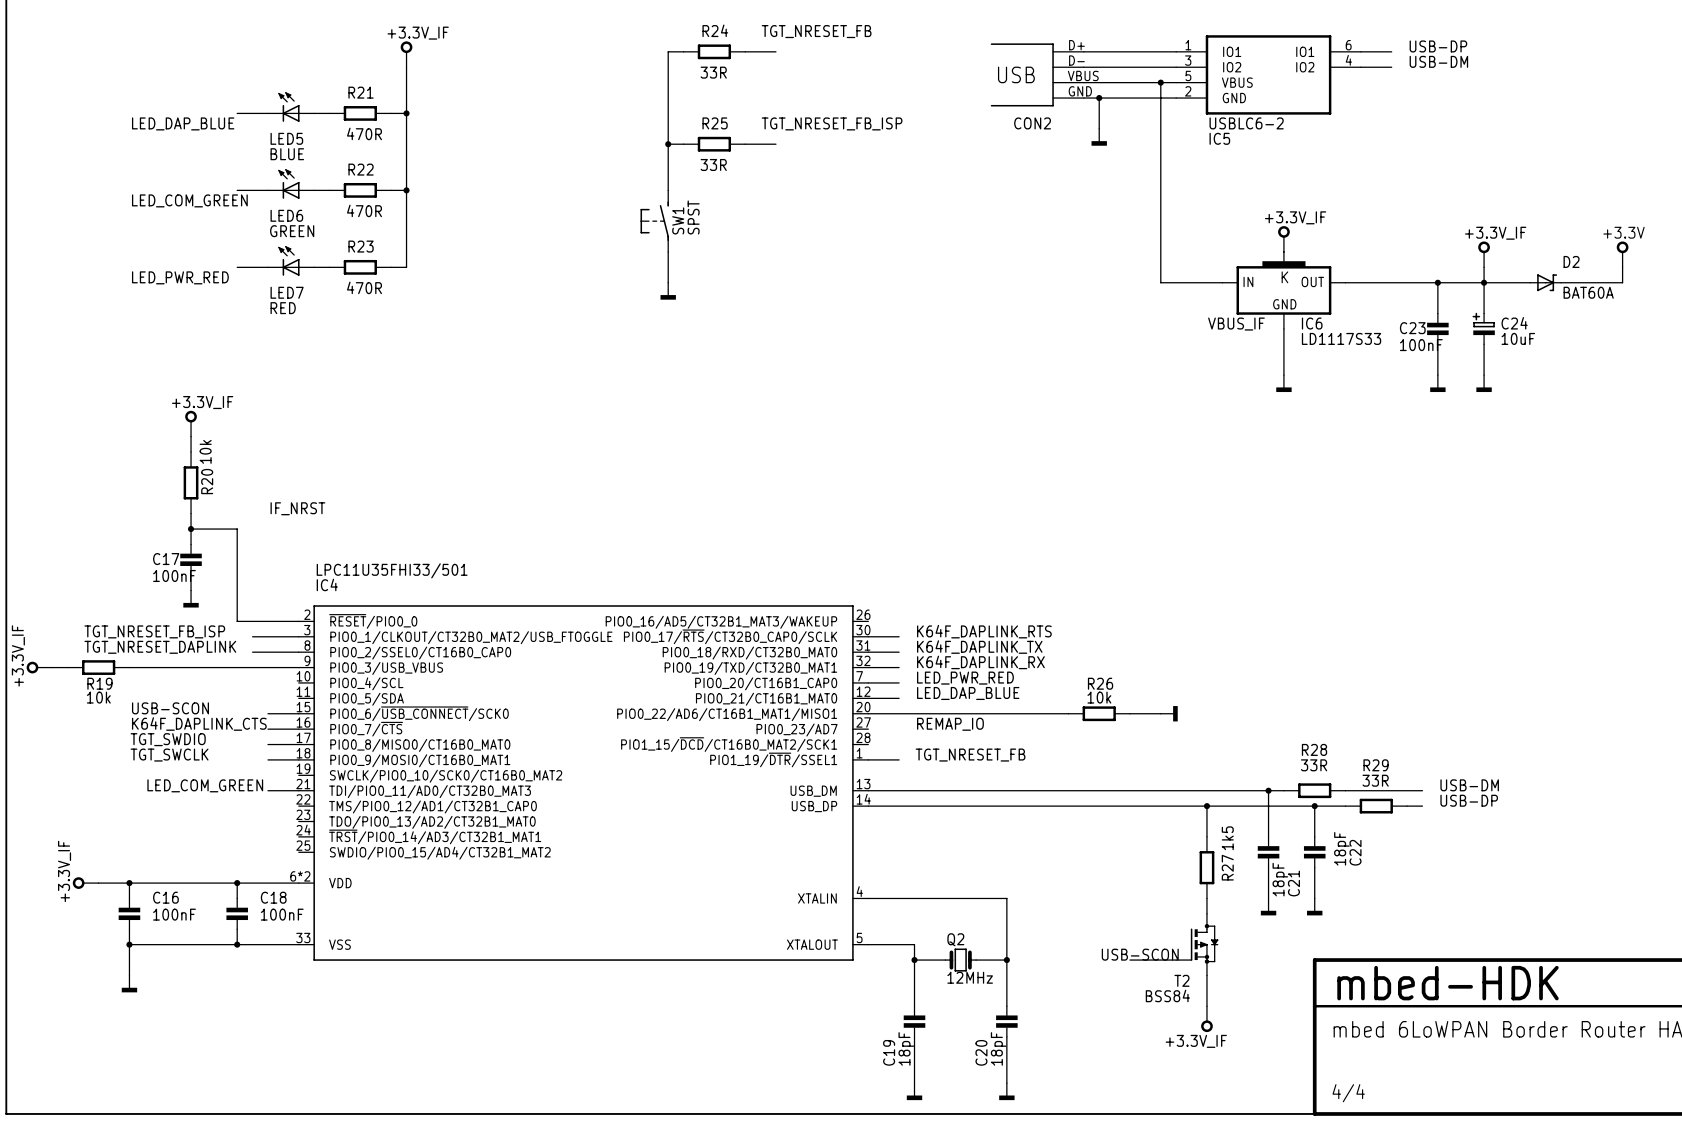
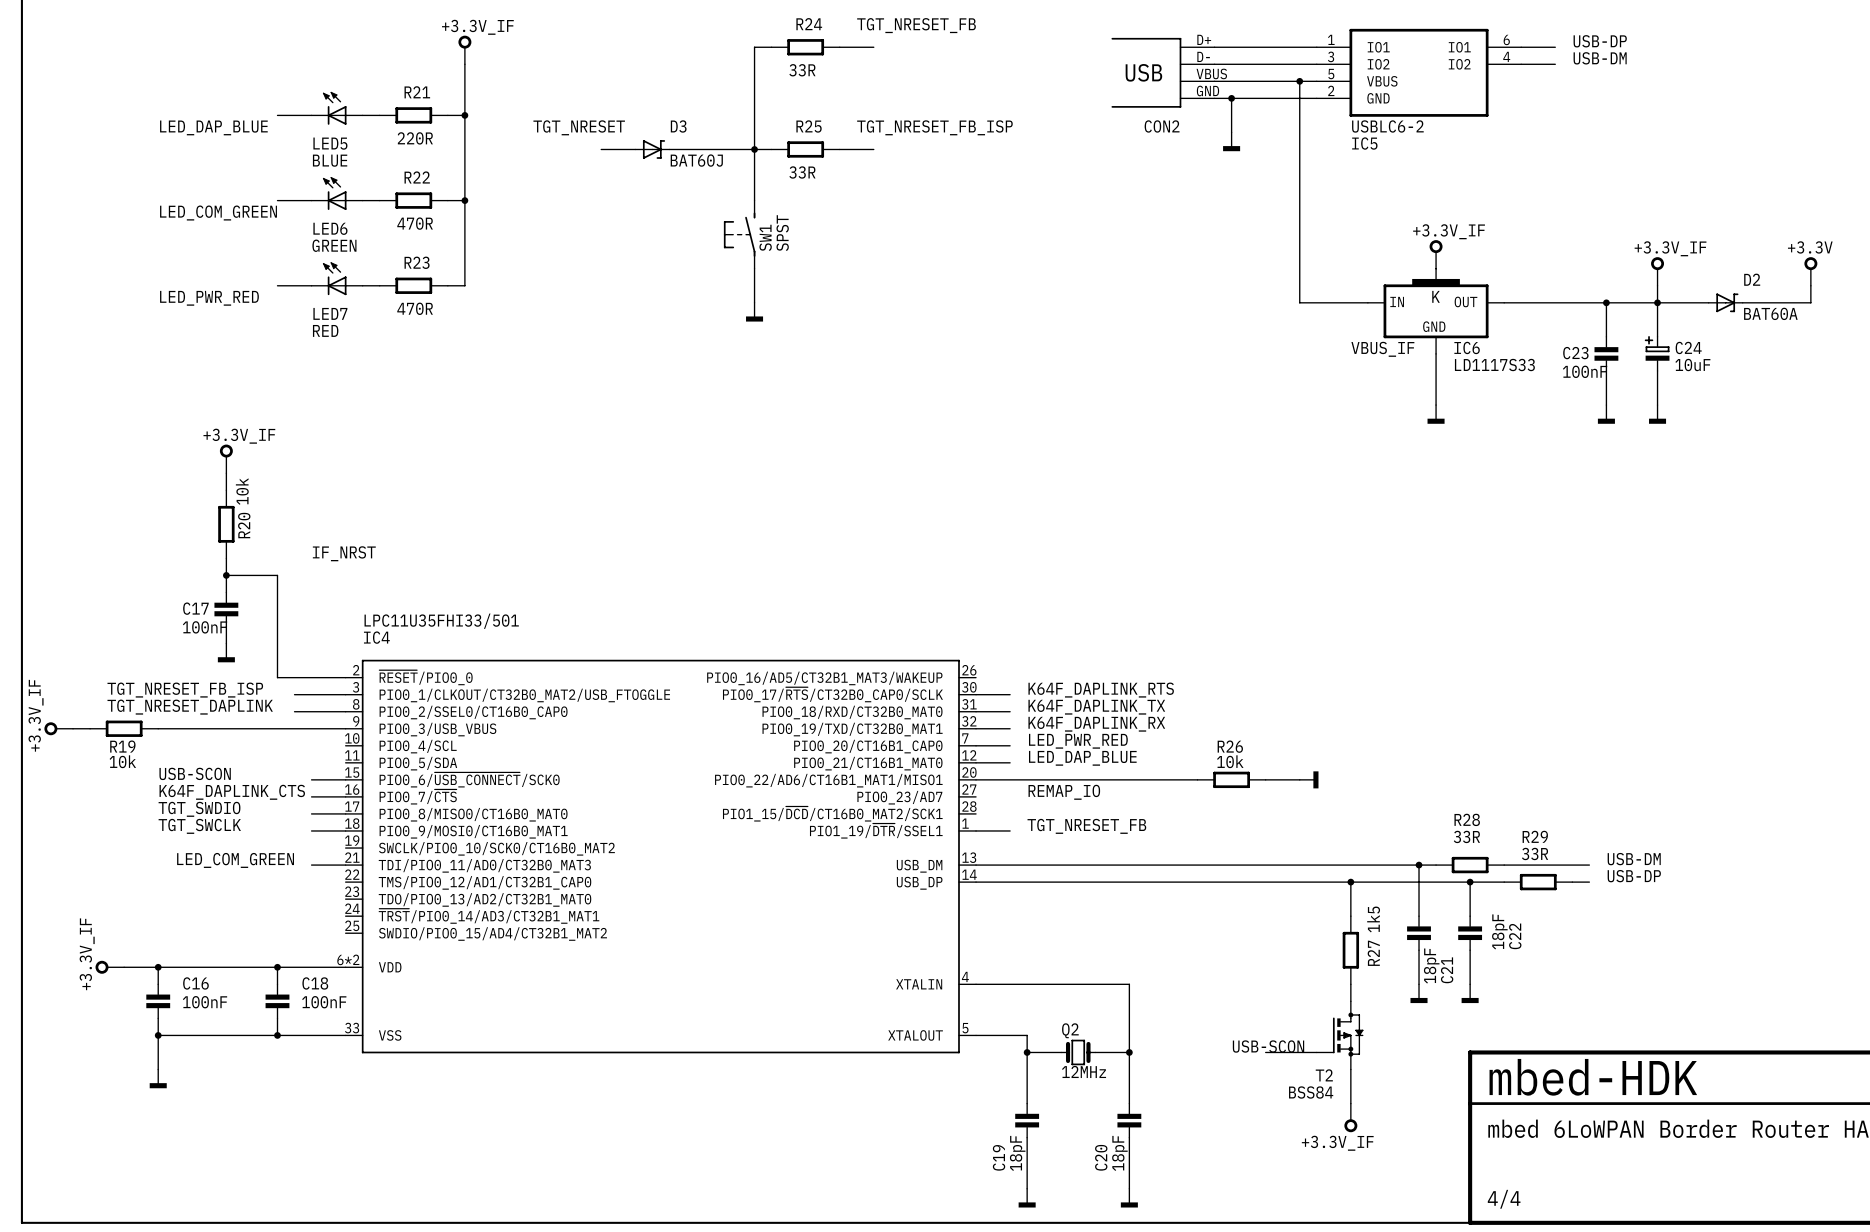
label: none -> TGT_NRESET (579, 127)
R21 value: 470R (364, 133) -> 220R (415, 138)
wire: none -> (601, 149) (635, 149)
D3: none -> BAT60J (652, 149)
wire: none -> (669, 149) (754, 149)

